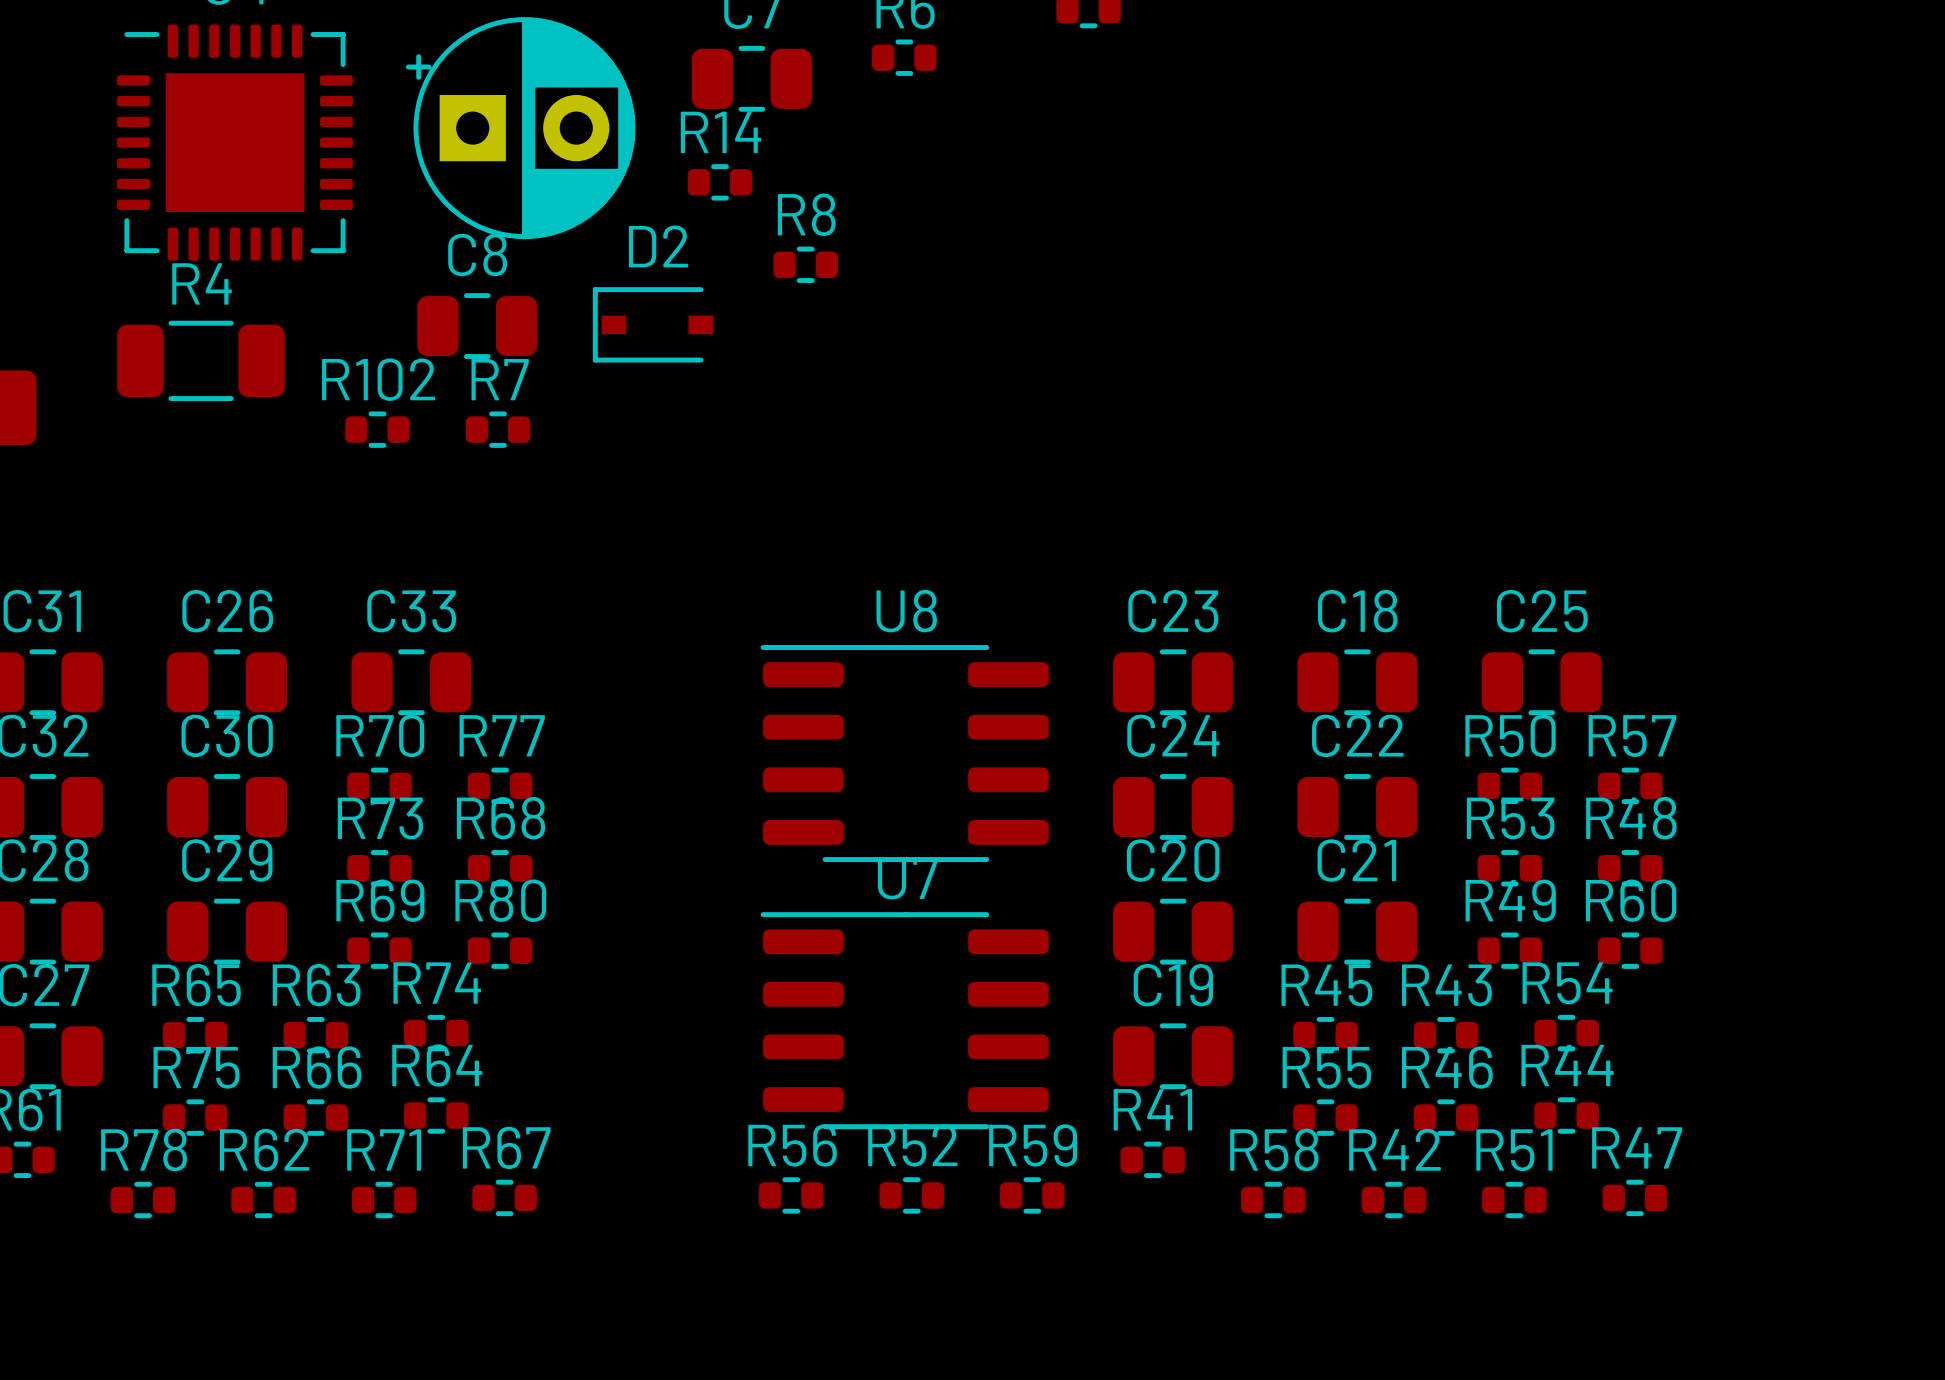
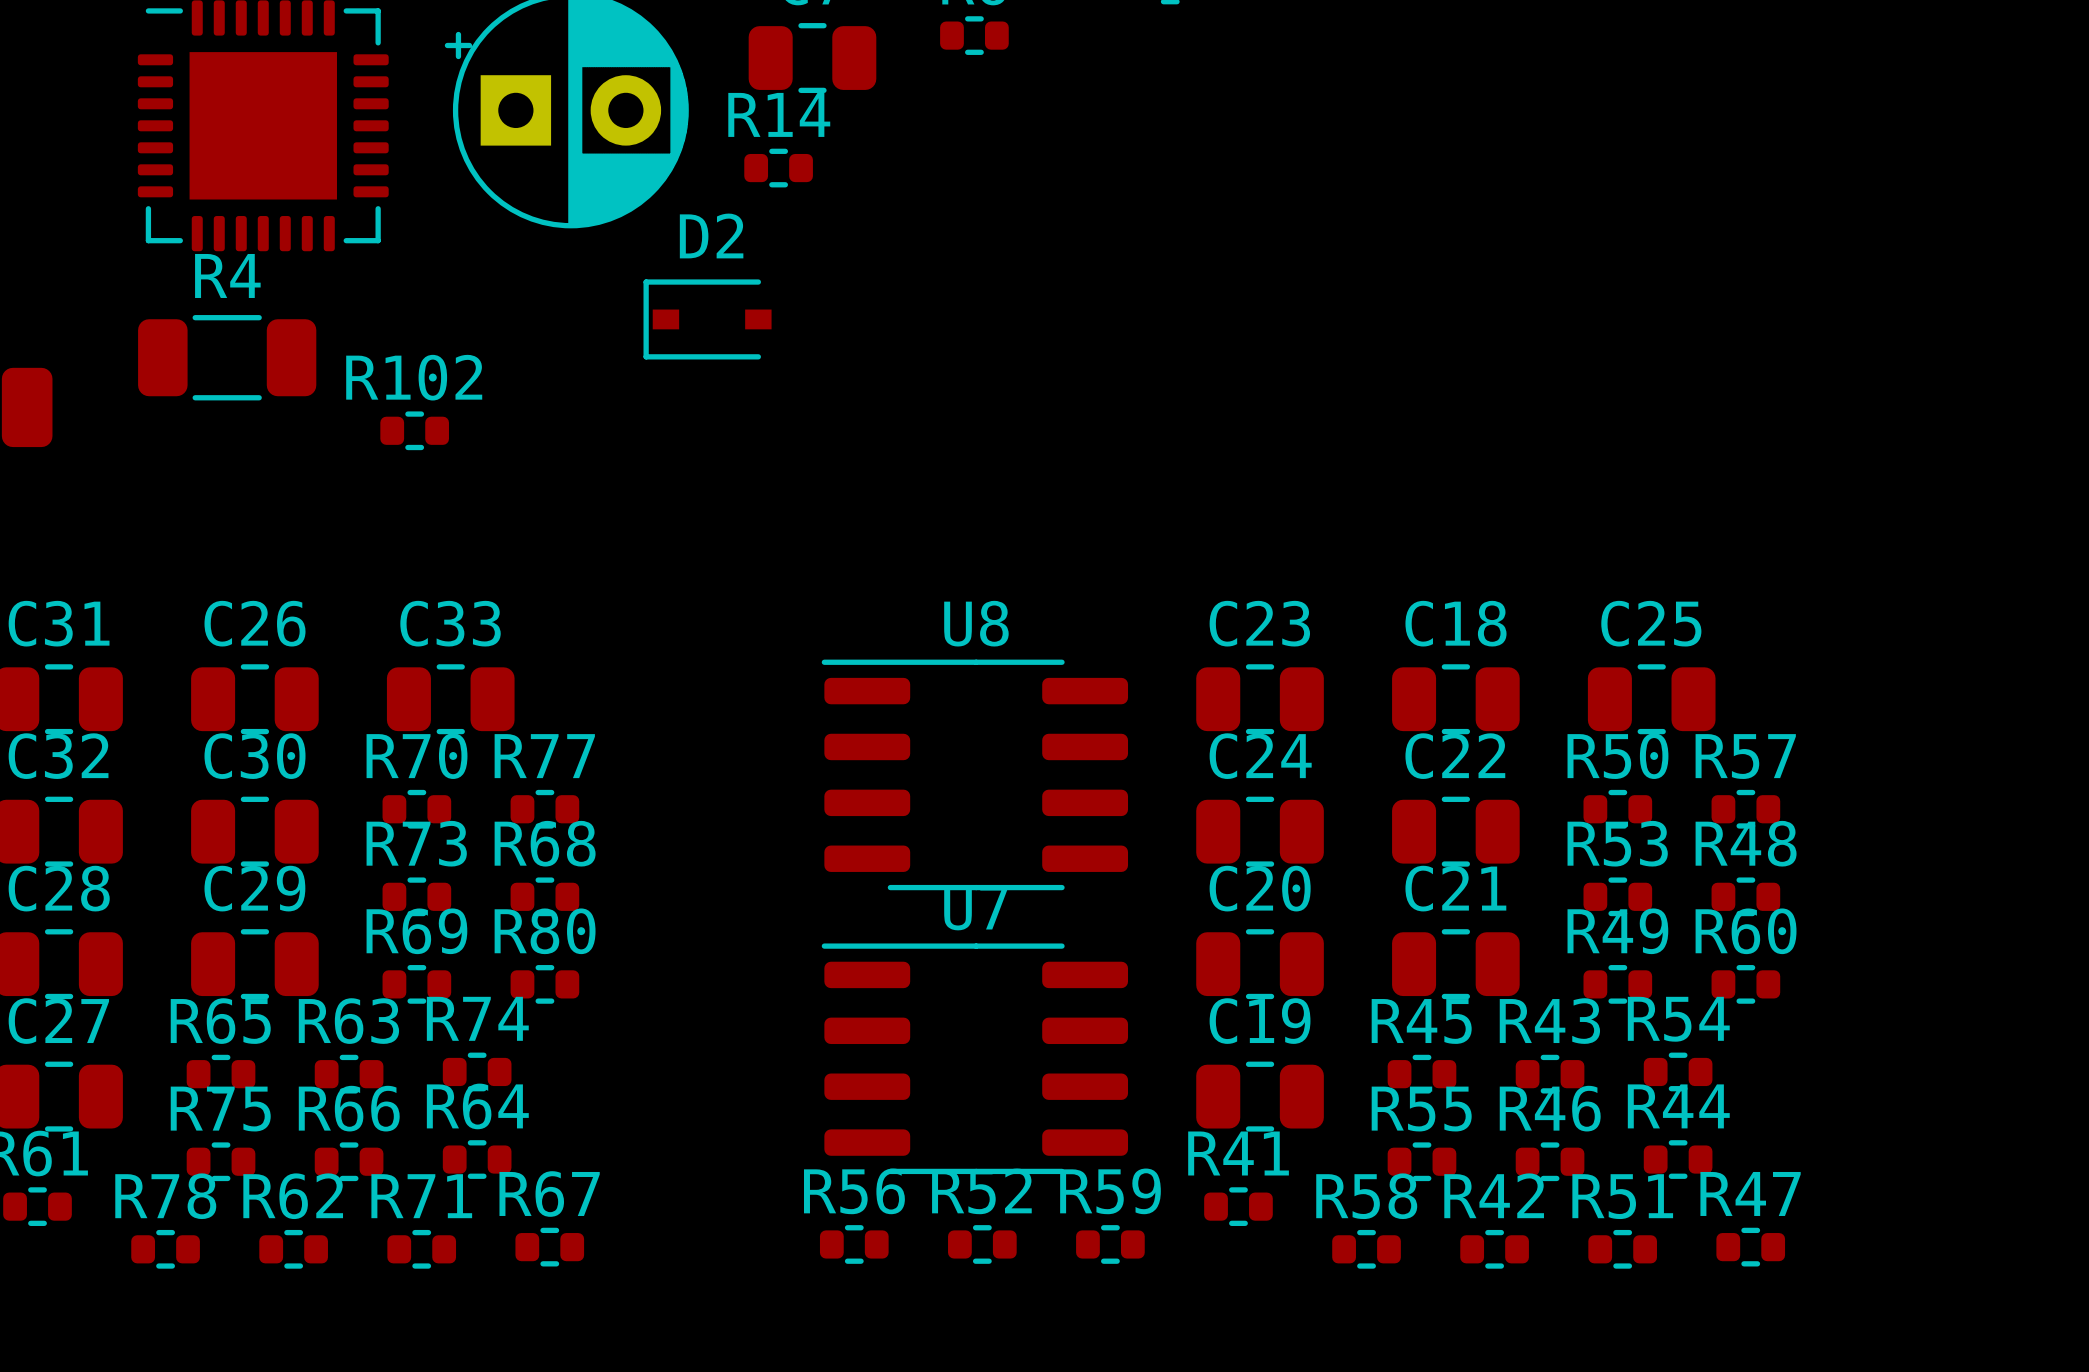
R8: (805, 264) -> none
C8: (477, 326) -> none
R7: (498, 429) -> none

